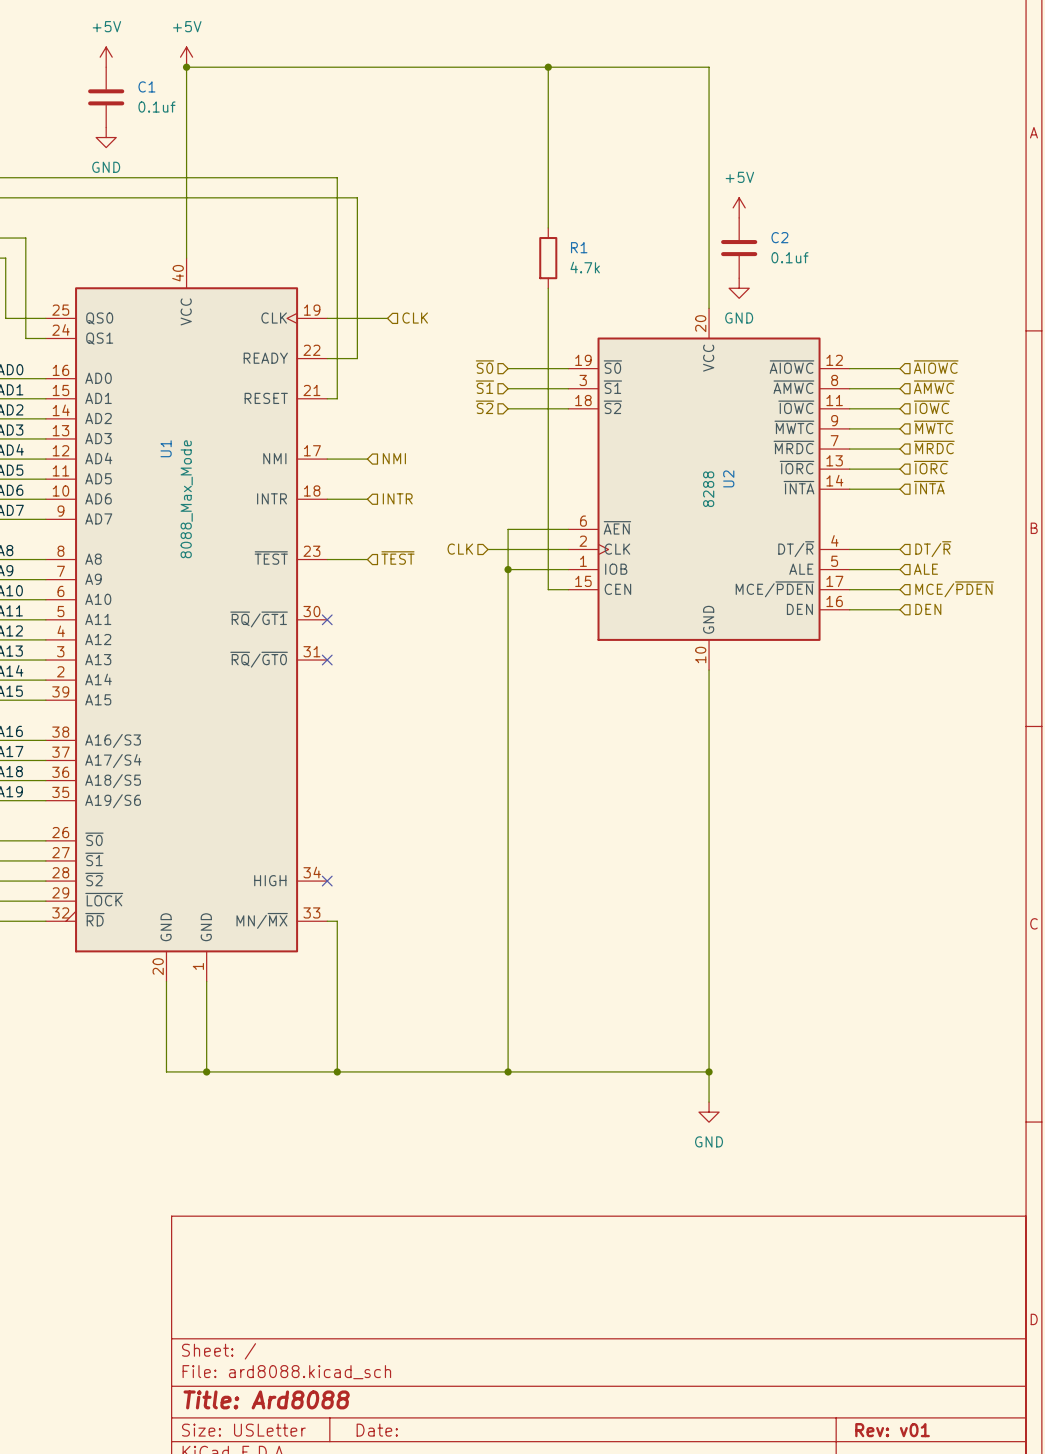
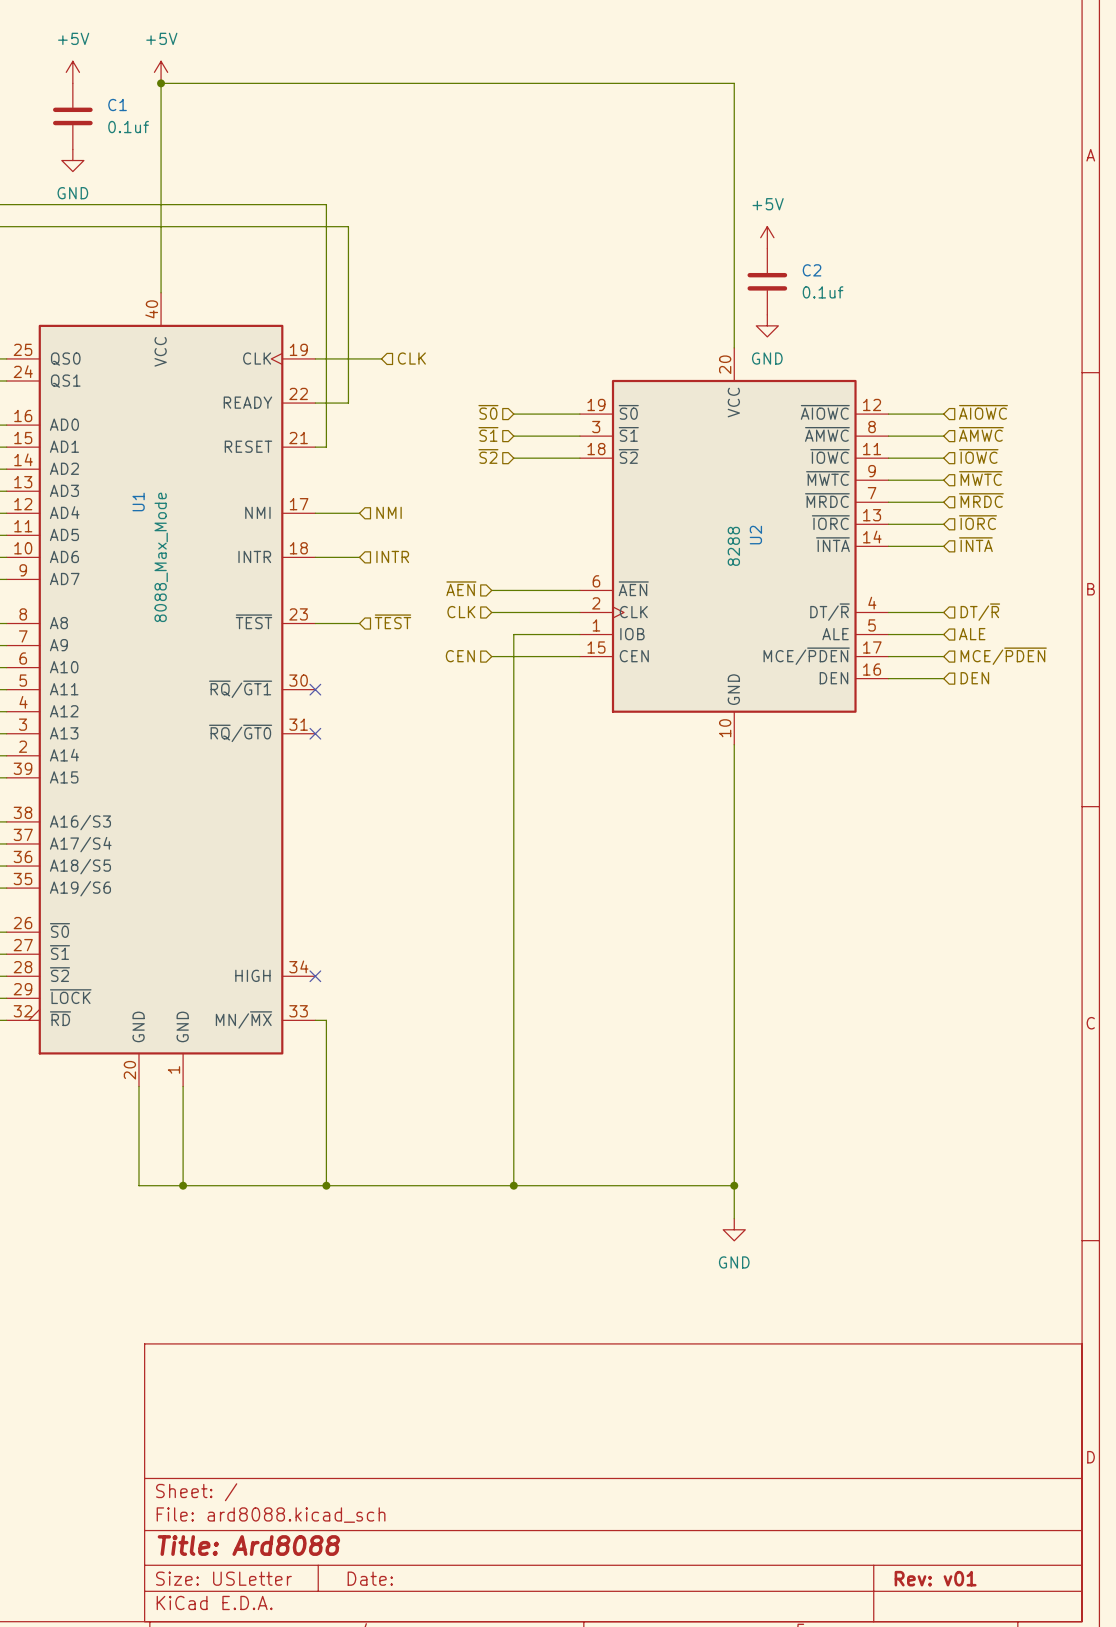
wire: (548, 67) (548, 227) -> none
junction: (548, 67) -> none
R1: 4.7k (548, 258) -> none
wire: (548, 288) (548, 589) -> (491, 656) (557, 656)
hierarchical label: none -> ~{AEN} (461, 588)
wire: (508, 529) (508, 569) -> (513, 590) (491, 590)
junction: (508, 569) -> none
hierarchical label: none -> CEN (460, 656)

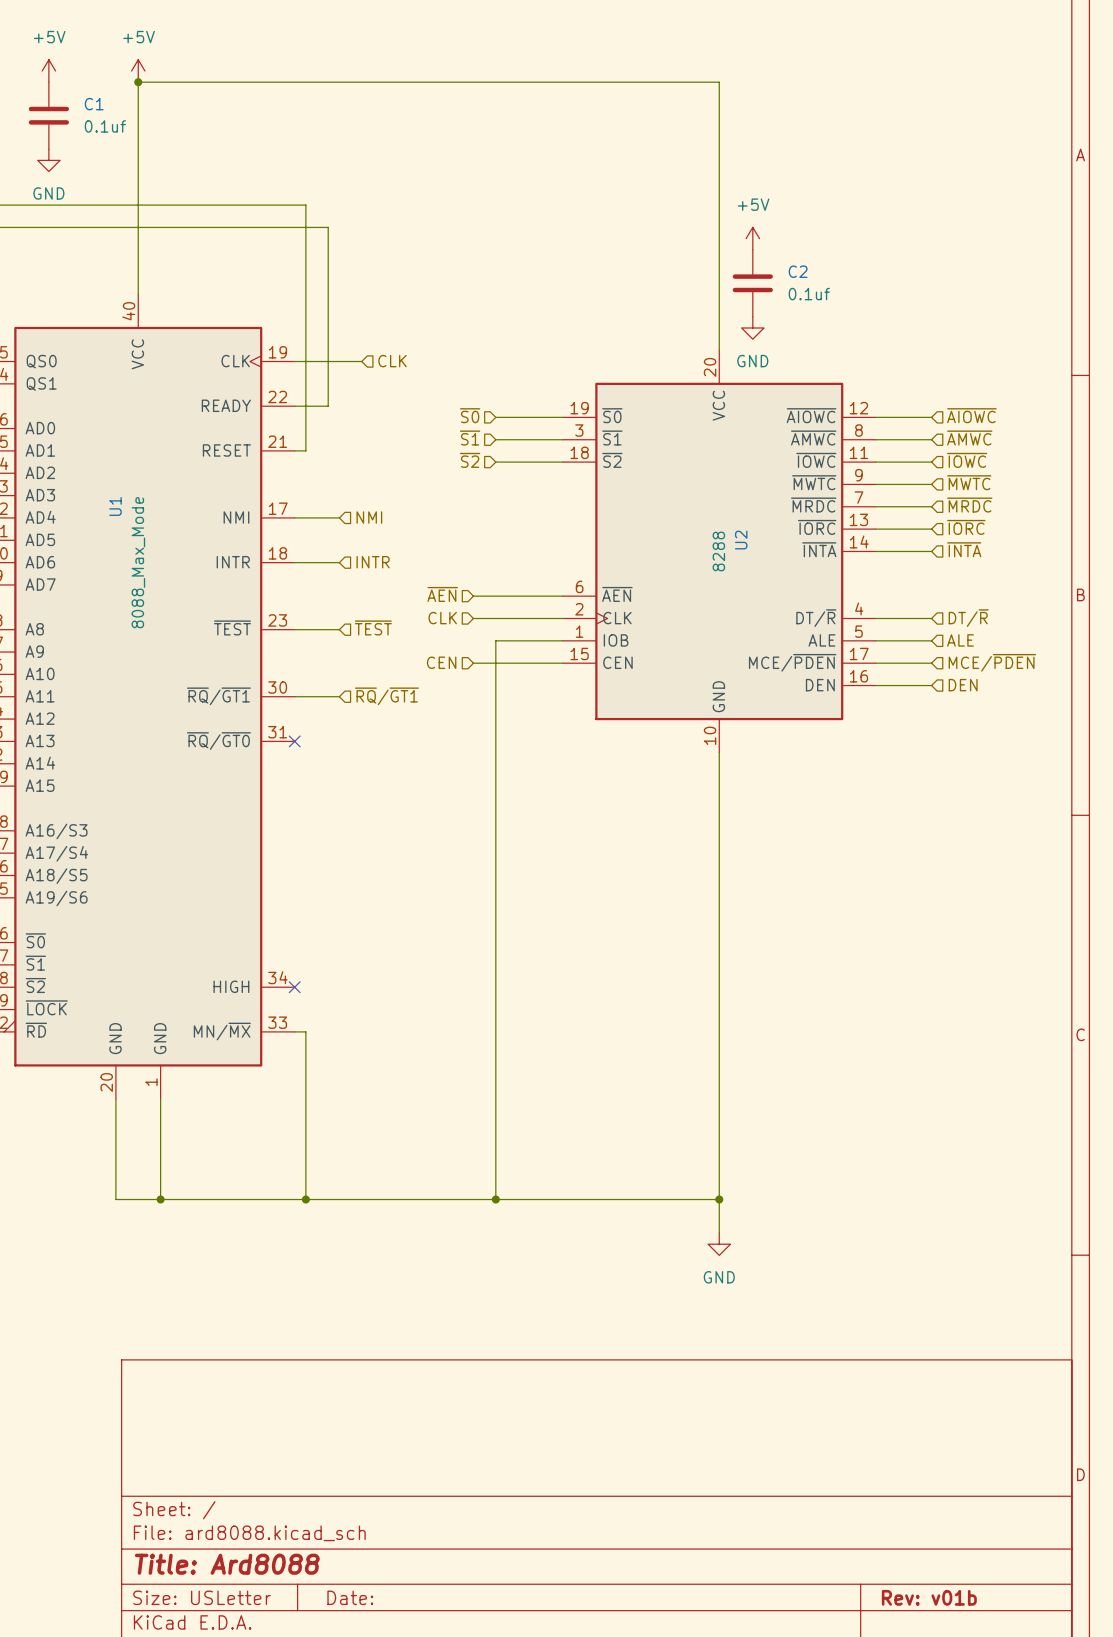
wire: none -> (294, 696) (339, 696)
no-connect mark: (315, 689) -> none
hierarchical label: none -> ~{RQ}/~{GT1} (386, 696)
title block: Rev: v01 (935, 1578) -> Rev: v01b (929, 1597)

